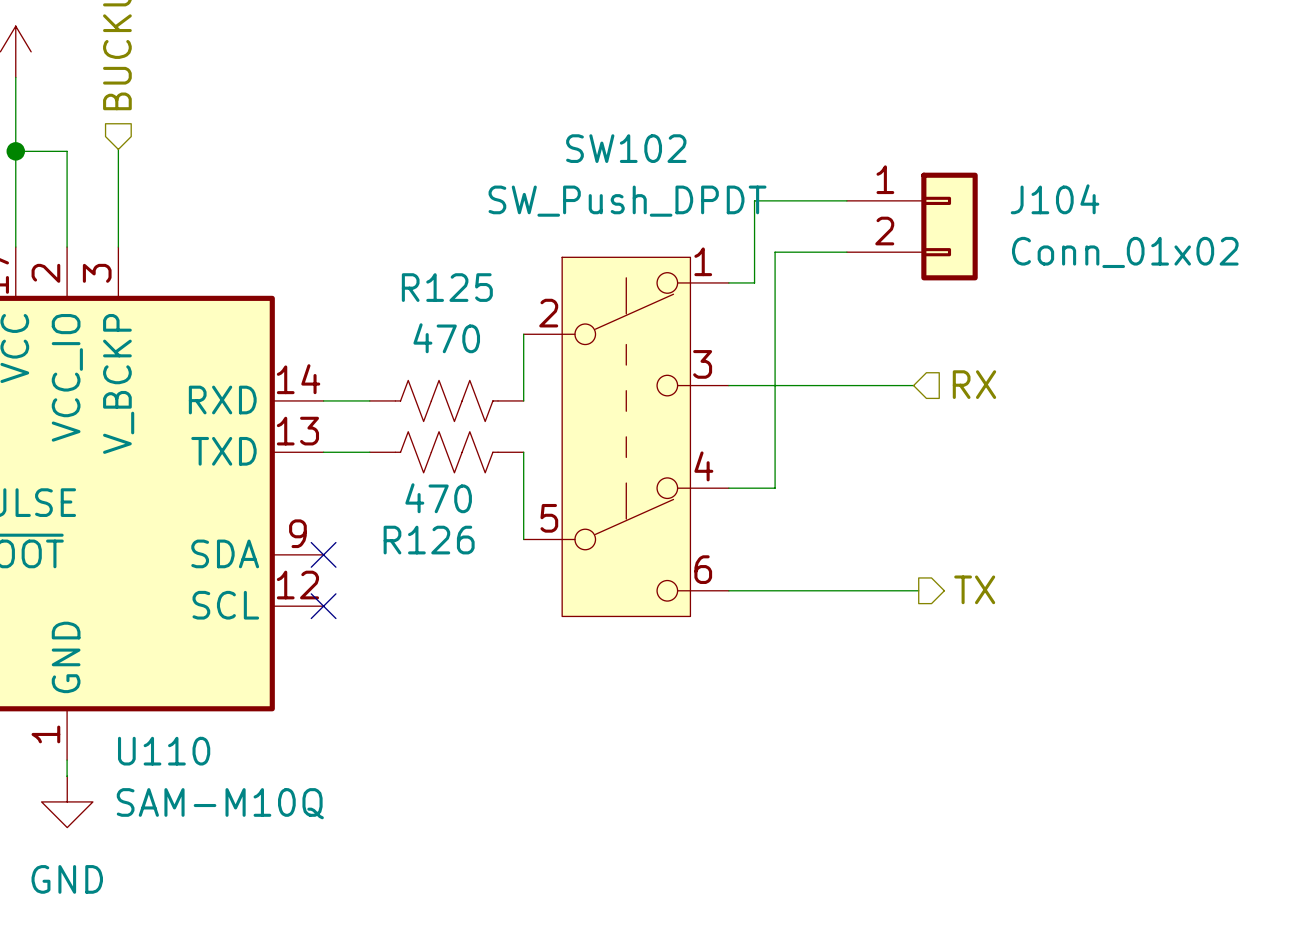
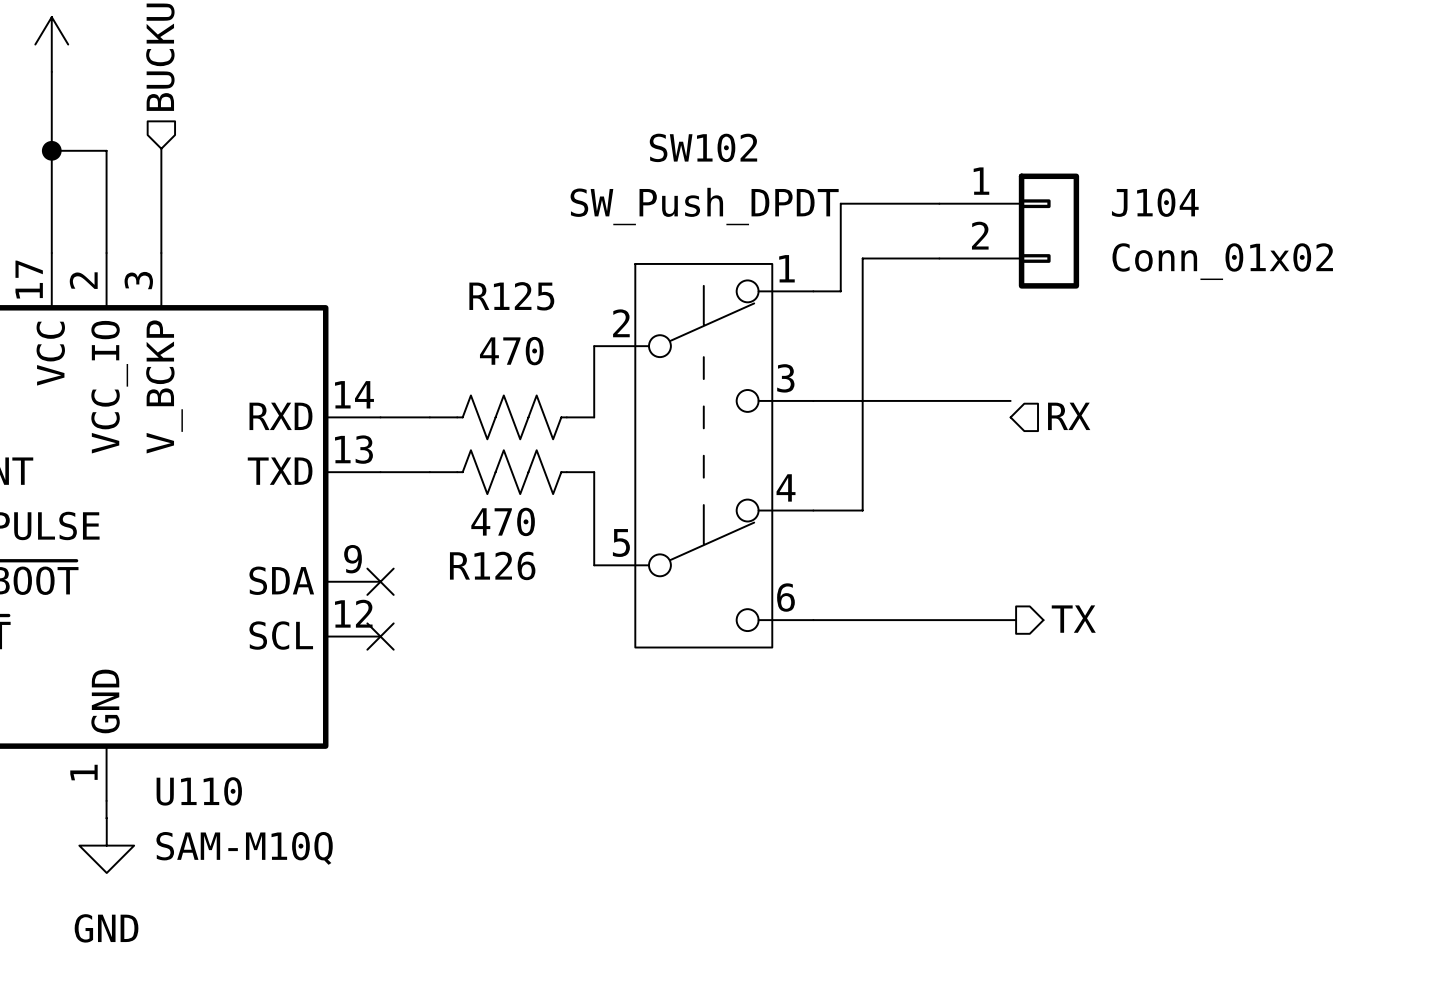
hierarchical label position: RX (974, 384) -> RX (1069, 416)

